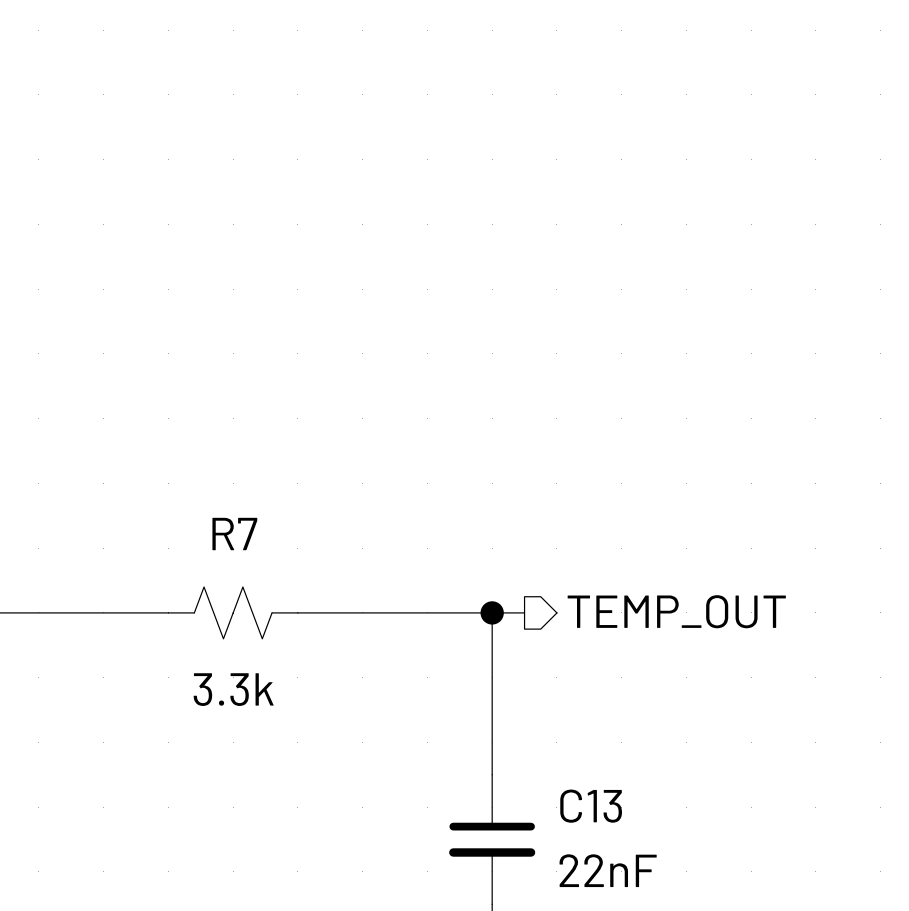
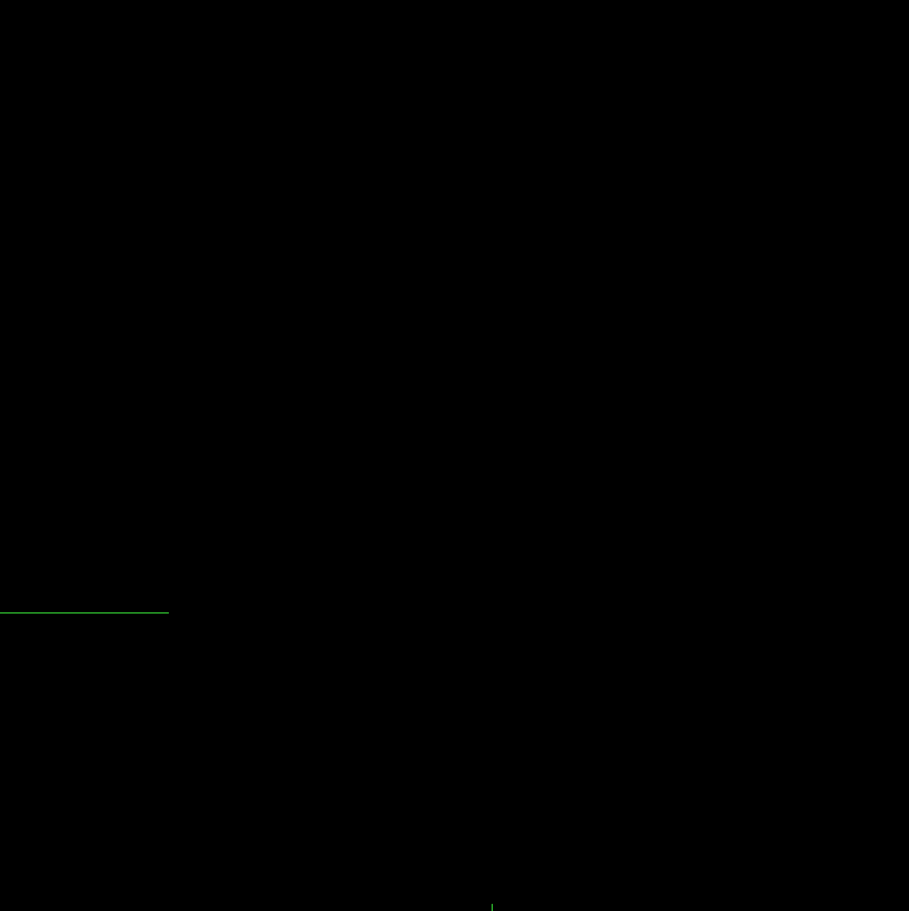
hierarchical label: TEMP_OUT (676, 611) -> none
R7: 3.3k (233, 612) -> none
wire: (297, 612) (524, 612) -> none
wire: (492, 612) (492, 774) -> none
junction: (492, 612) -> none
C13: 22nF (492, 839) -> none

